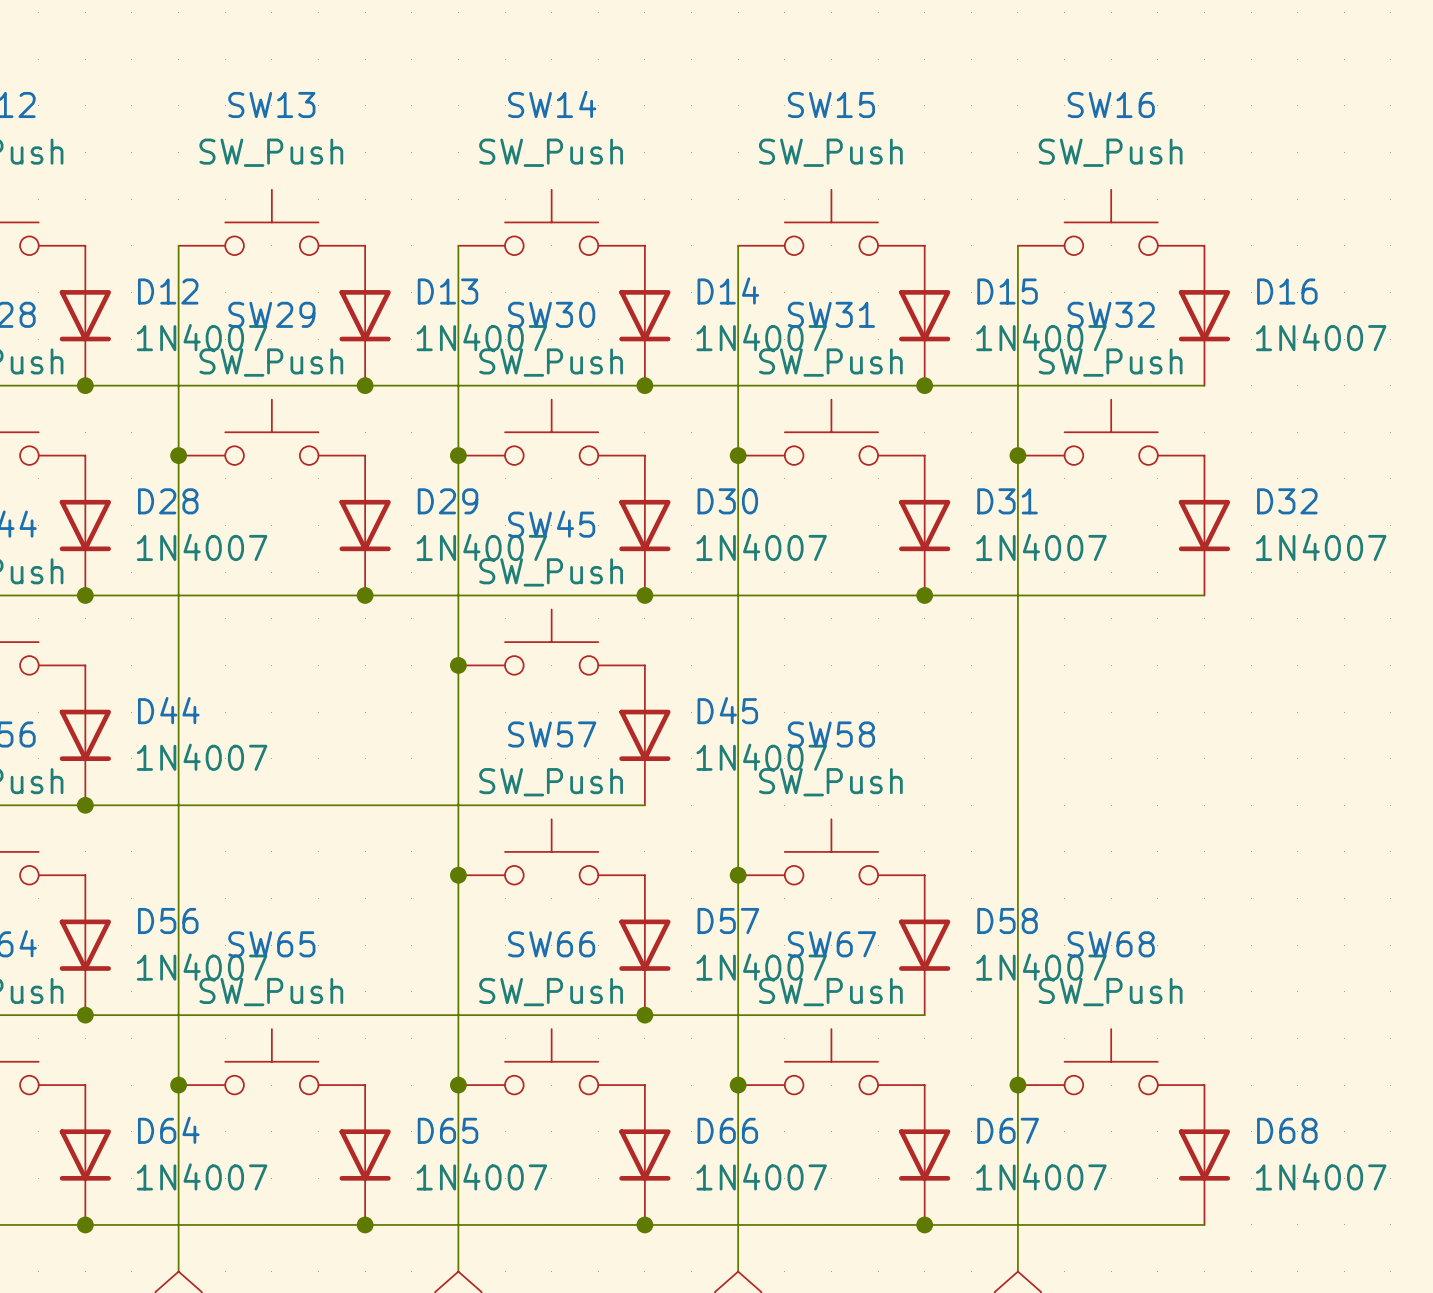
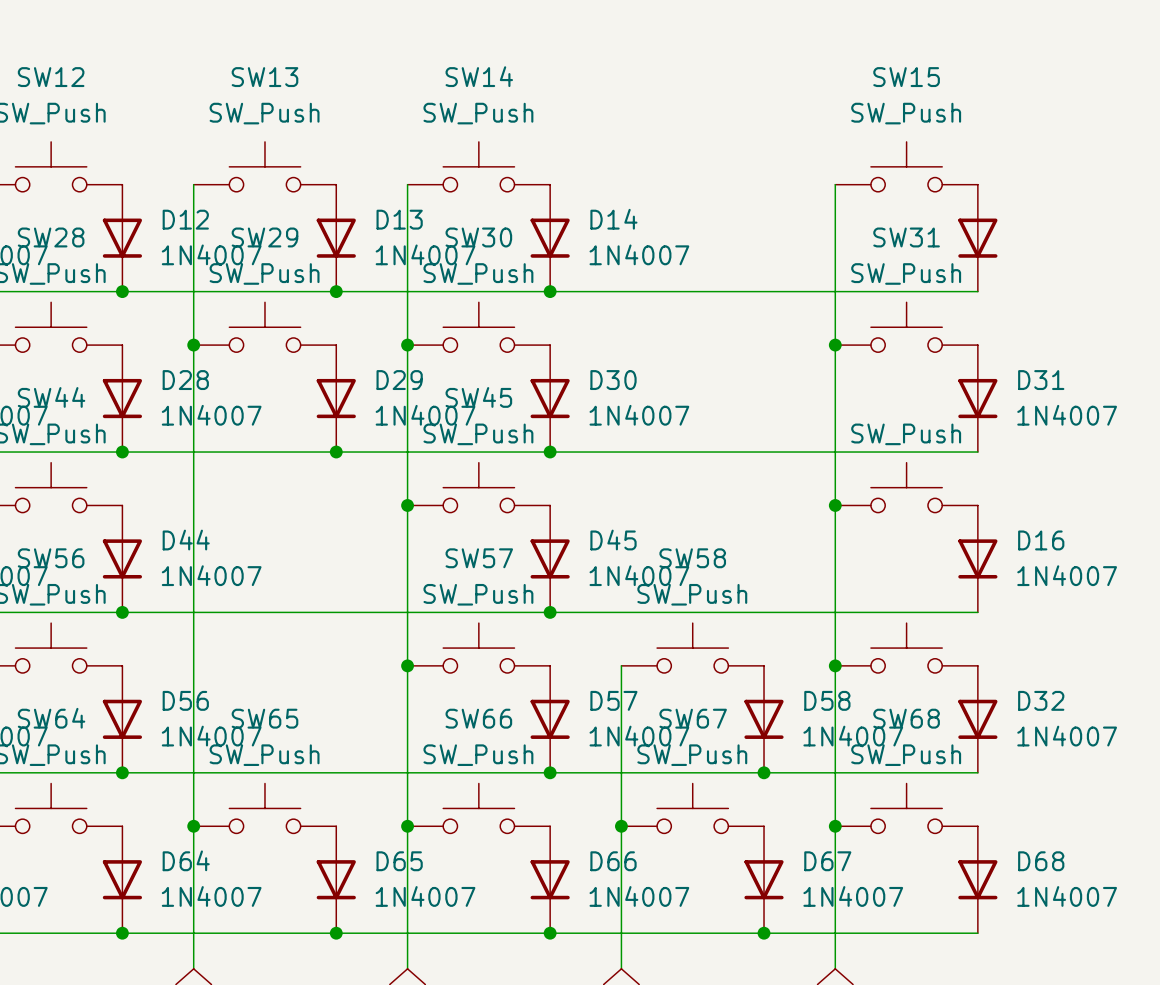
SW16 name: SW16 (1111, 104) -> SW15 (906, 77)
SW15: SW_Push (831, 222) -> none
wire: (738, 245) (738, 875) -> none
D16 name: D16 (1287, 291) -> none
SW32 name: SW32 (1111, 314) -> SW31 (906, 237)
D15: 1N4007 (924, 315) -> none
D16 value: 1N4007 (1321, 337) -> none
junction: (924, 385) -> none
SW31: SW_Push (831, 432) -> none
junction: (738, 455) -> none
D32 name: D32 (1287, 501) -> D31 (1041, 380)
D31: 1N4007 (924, 525) -> none
junction: (924, 595) -> none
part: none -> SW_Push (906, 487)
junction: none -> (835, 505)
D16: none -> 1N4007 (977, 558)
wire: none -> (550, 612) (977, 612)
junction: none -> (550, 612)
part: none -> (906, 648)
junction: (738, 875) -> none
junction: none -> (835, 665)
D32: none -> 1N4007 (977, 719)
wire: none -> (764, 772) (977, 772)
junction: none -> (764, 772)

